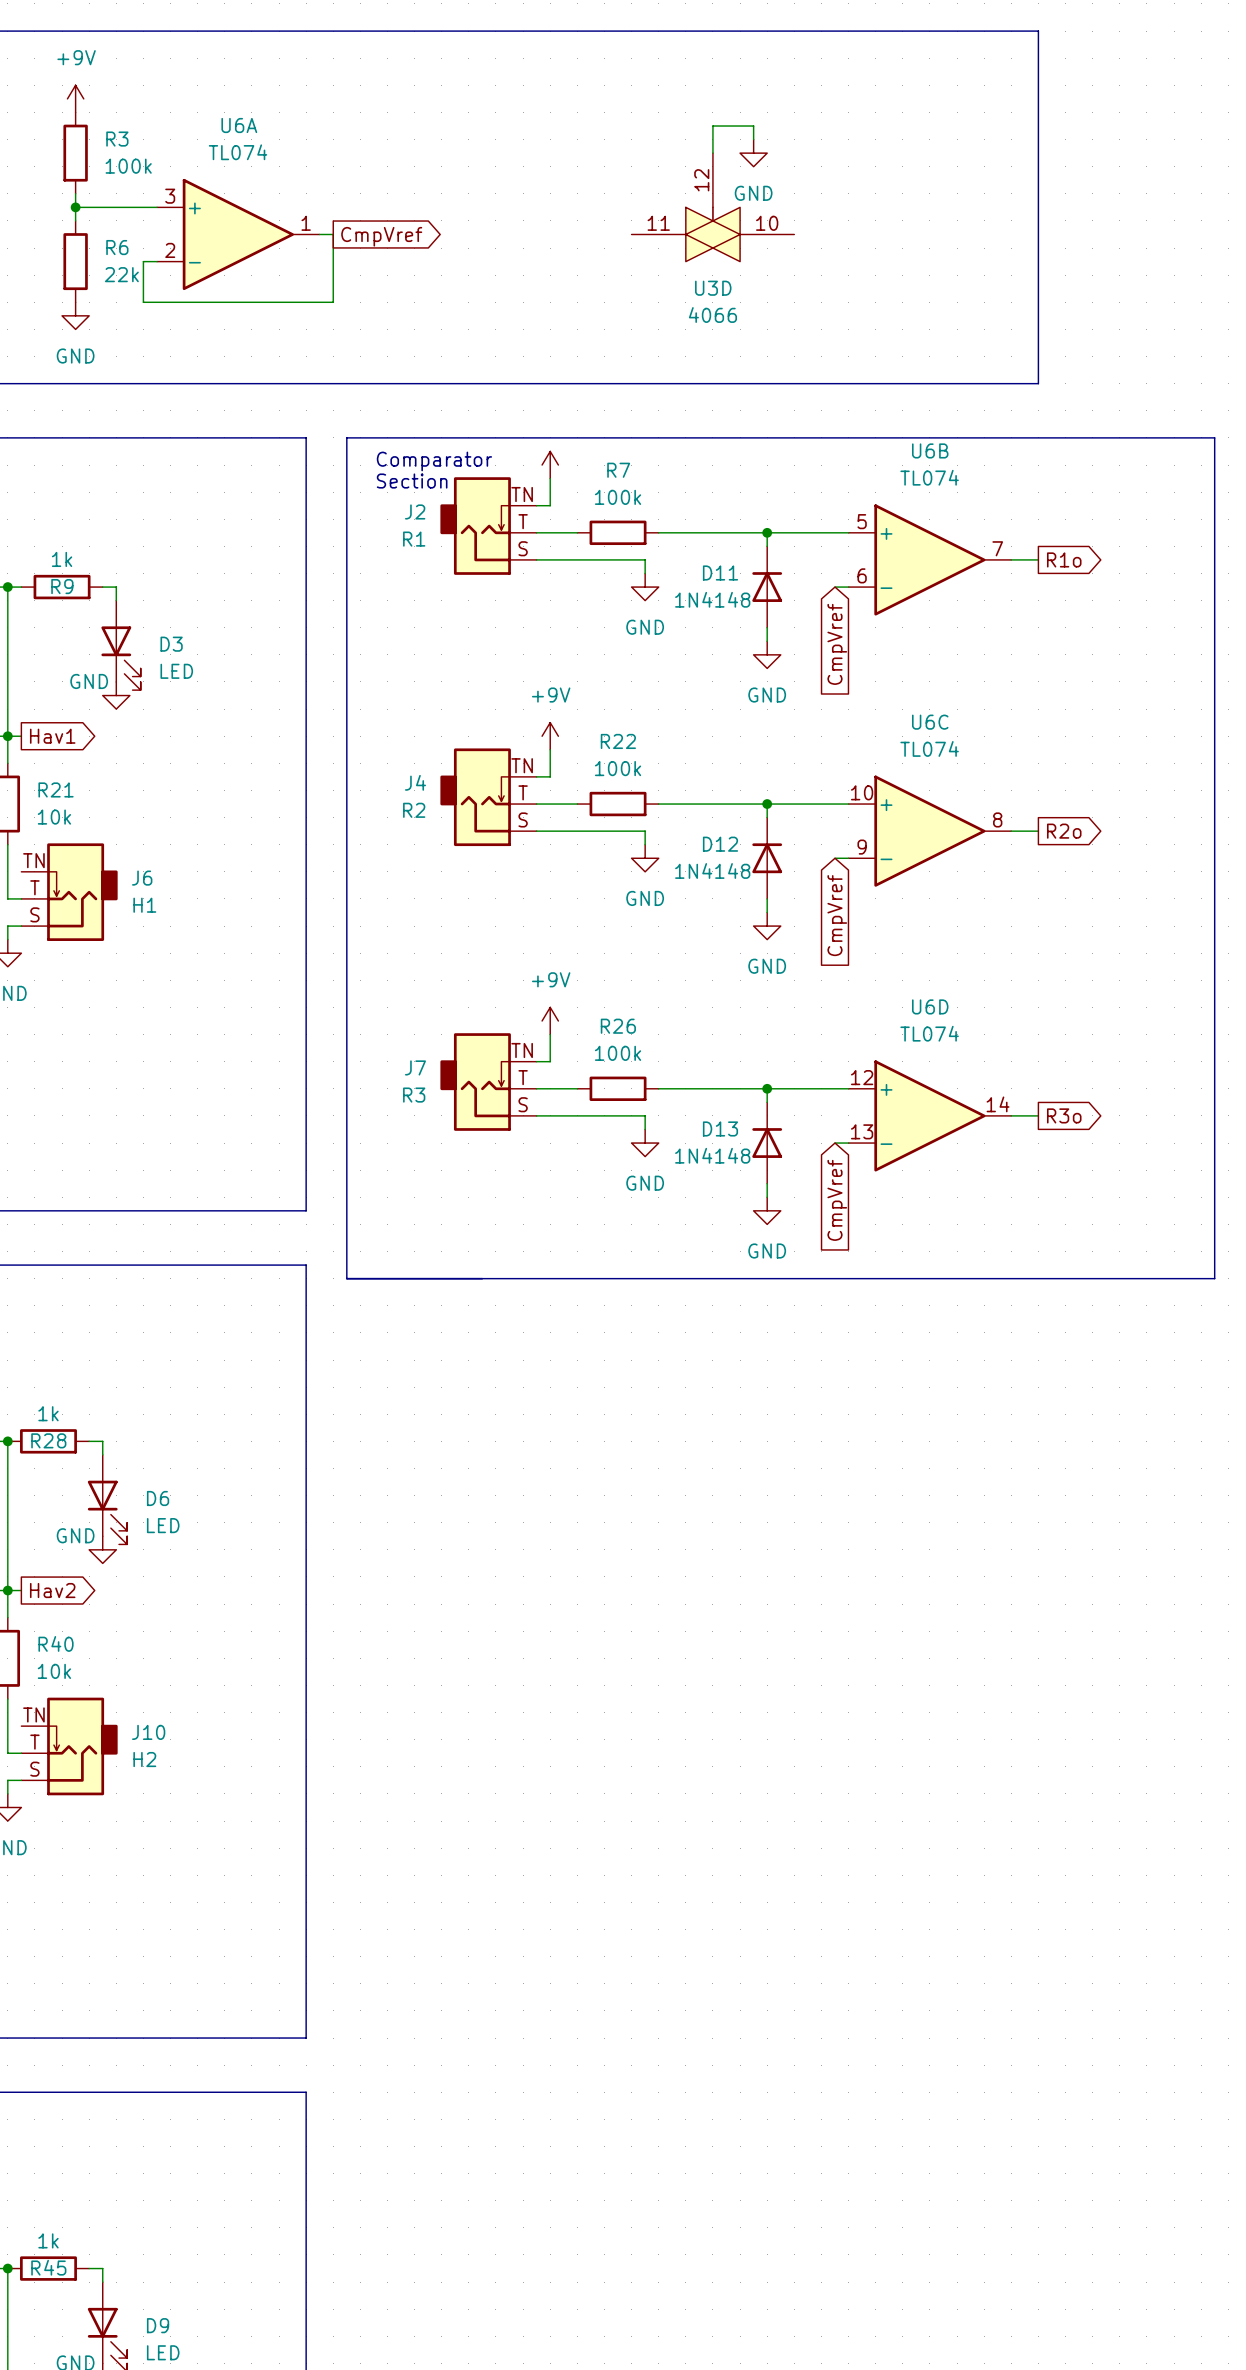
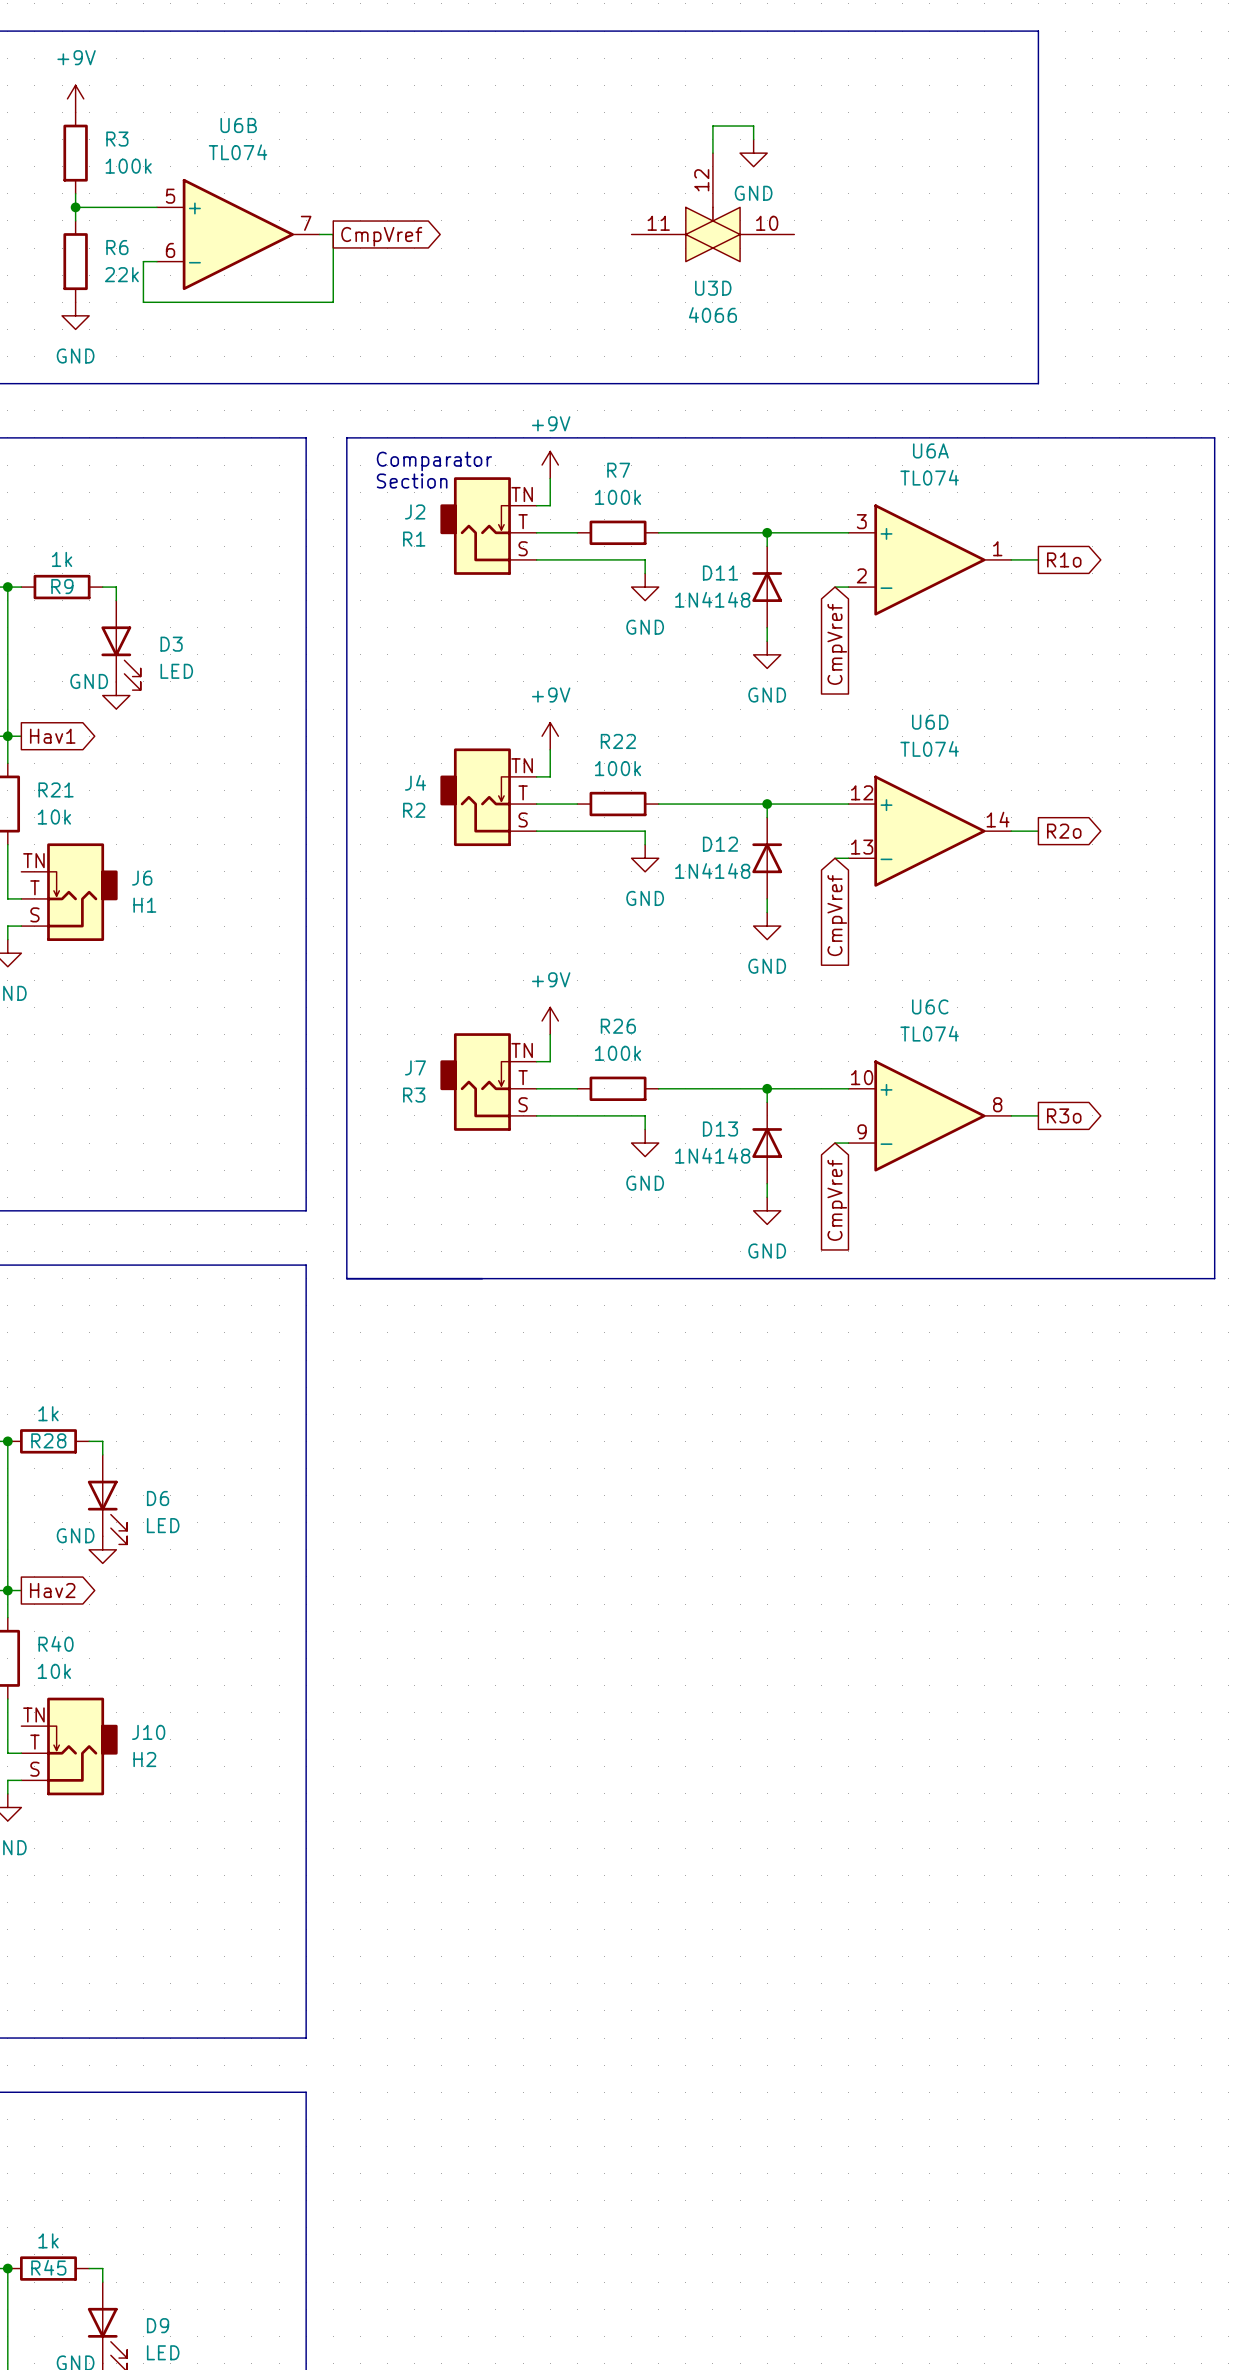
U6A position: (238, 234) -> (929, 559)
power symbol text: none -> +9V (551, 423)
U6B position: (929, 559) -> (238, 234)
U6C position: (929, 831) -> (929, 1115)
U6D position: (929, 1115) -> (929, 831)

